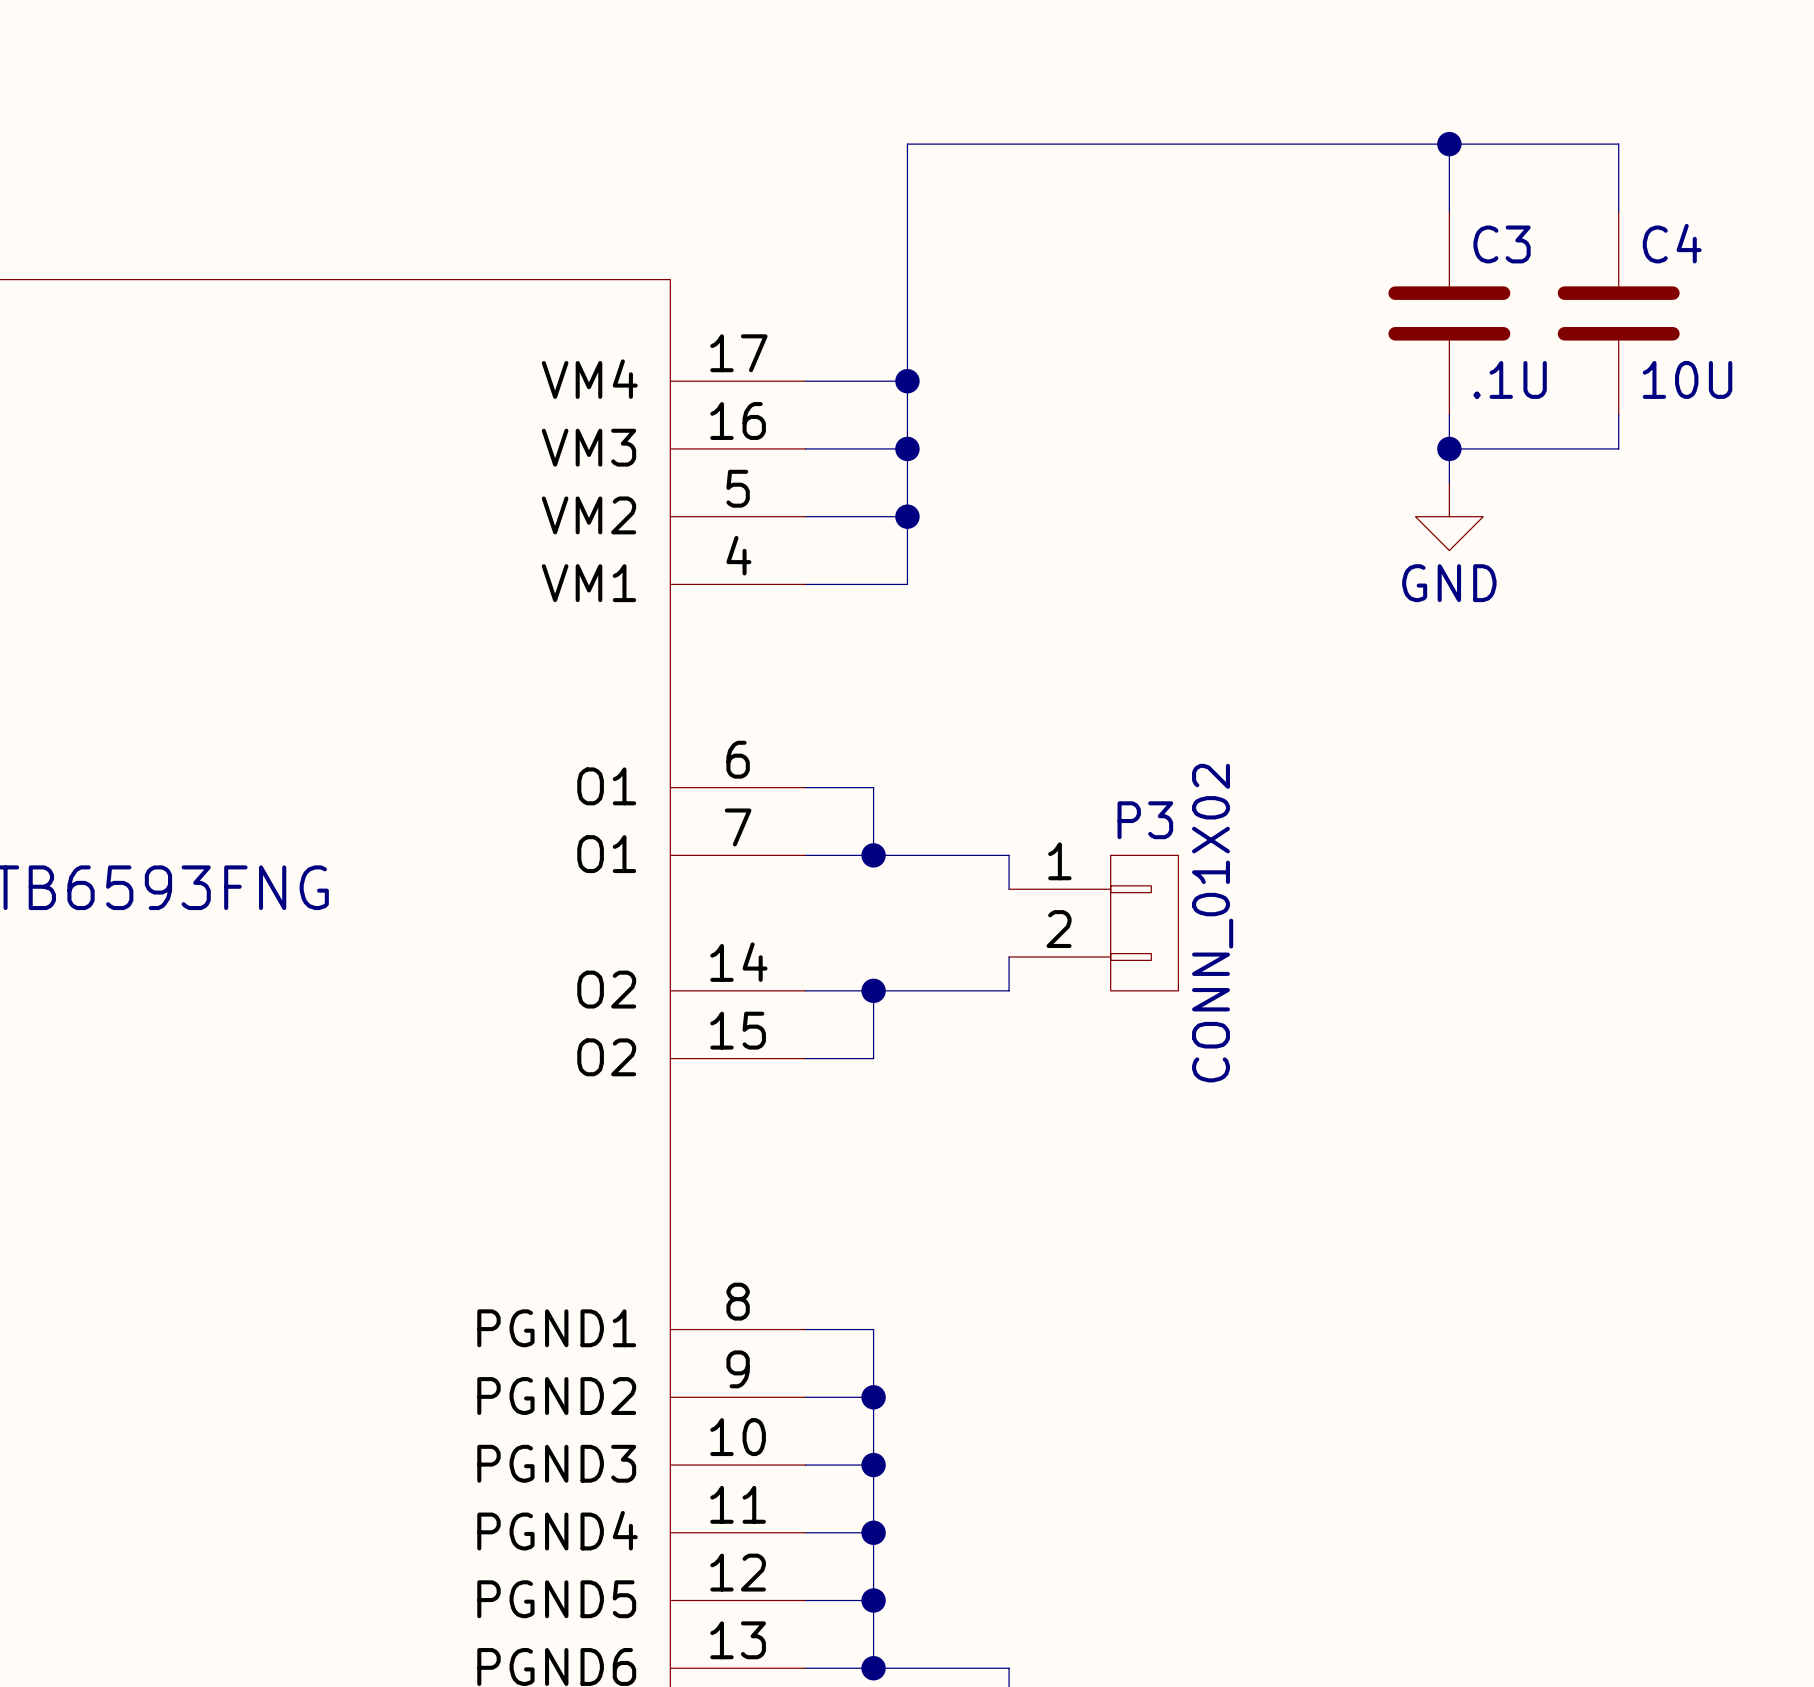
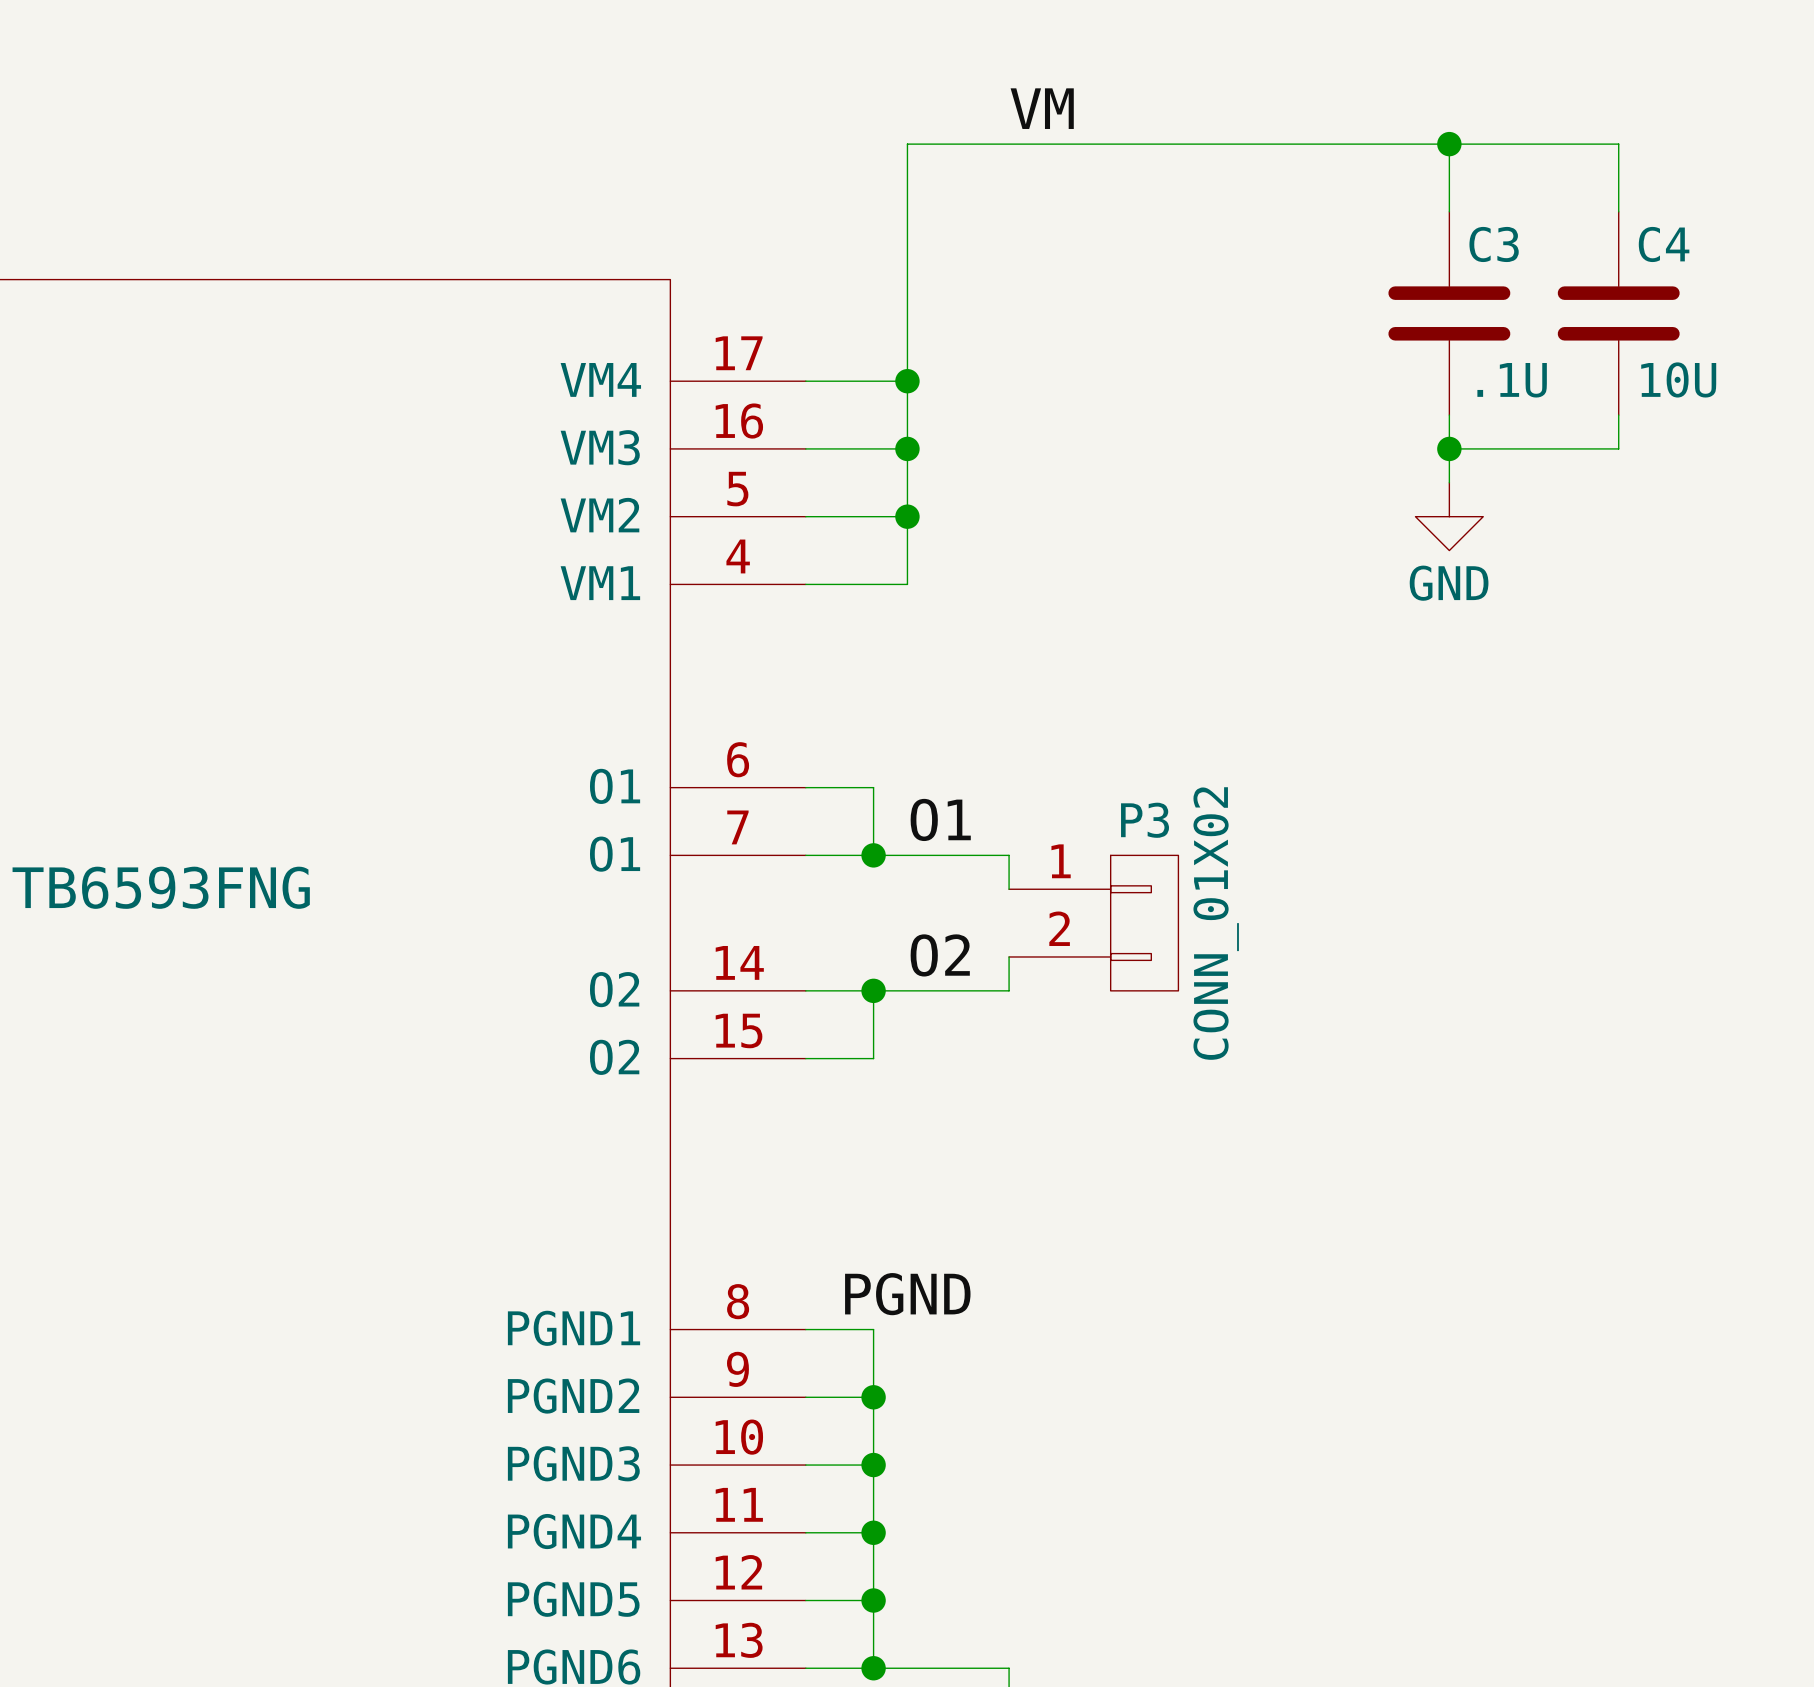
label: none -> VM (1042, 108)
label: none -> O1 (940, 819)
label: none -> O2 (940, 955)
label: none -> PGND (907, 1294)

